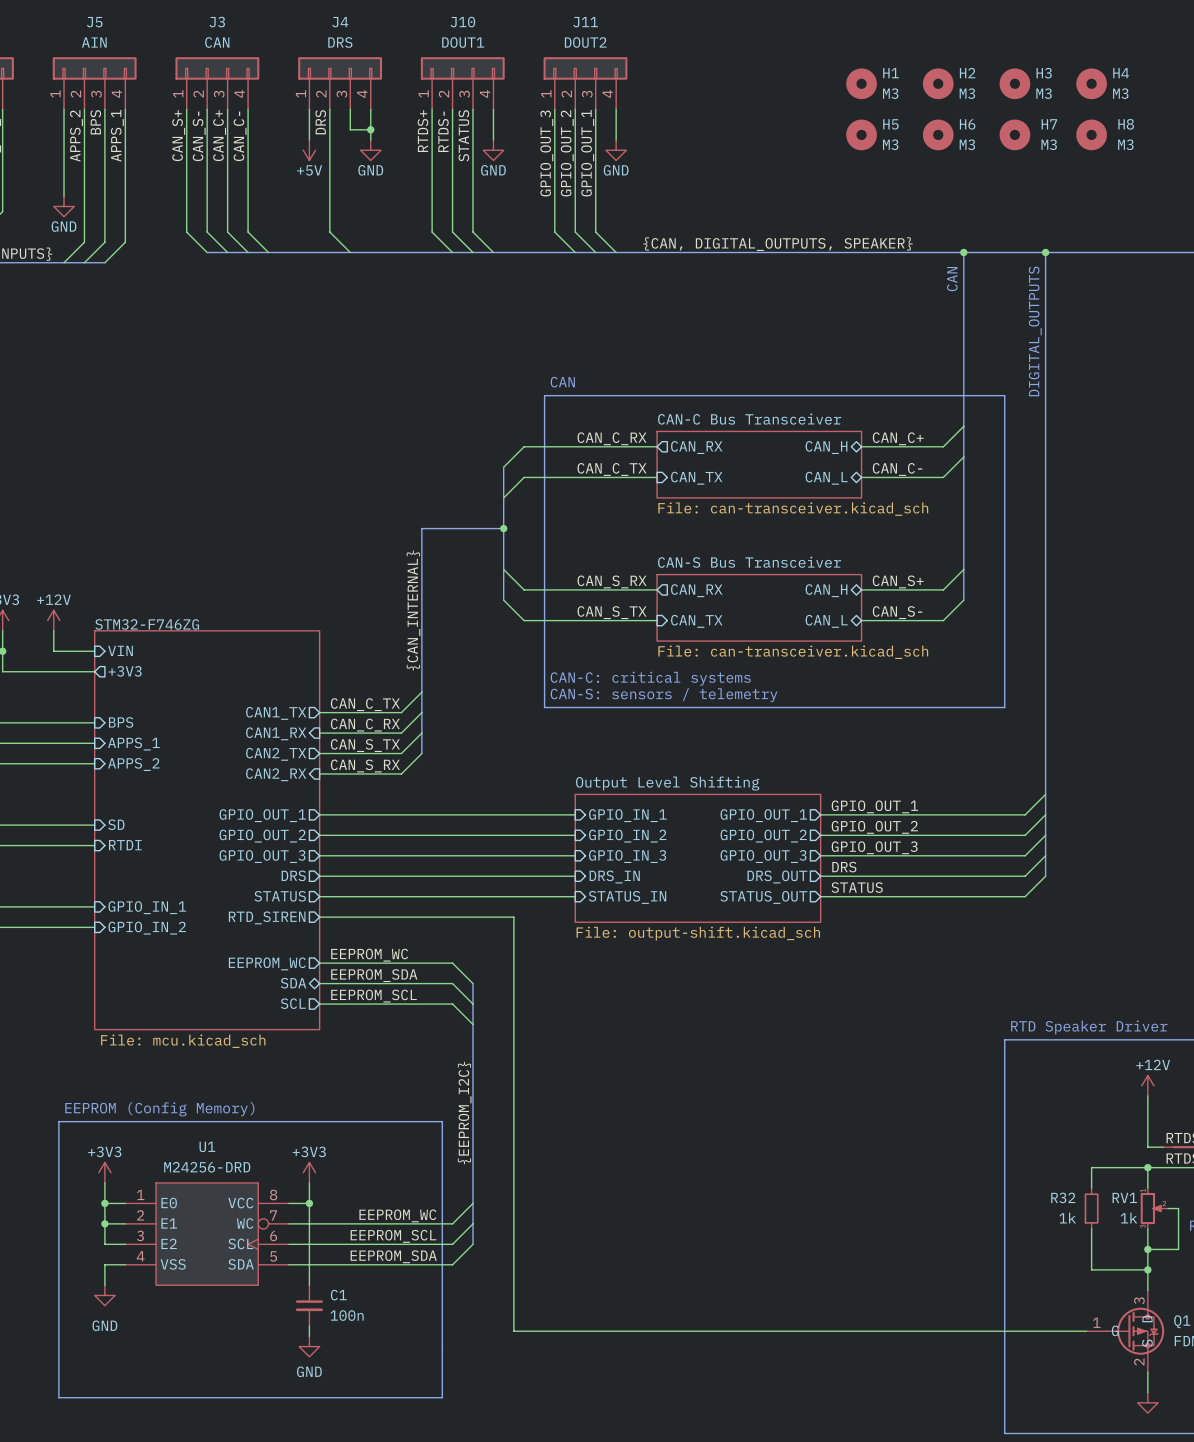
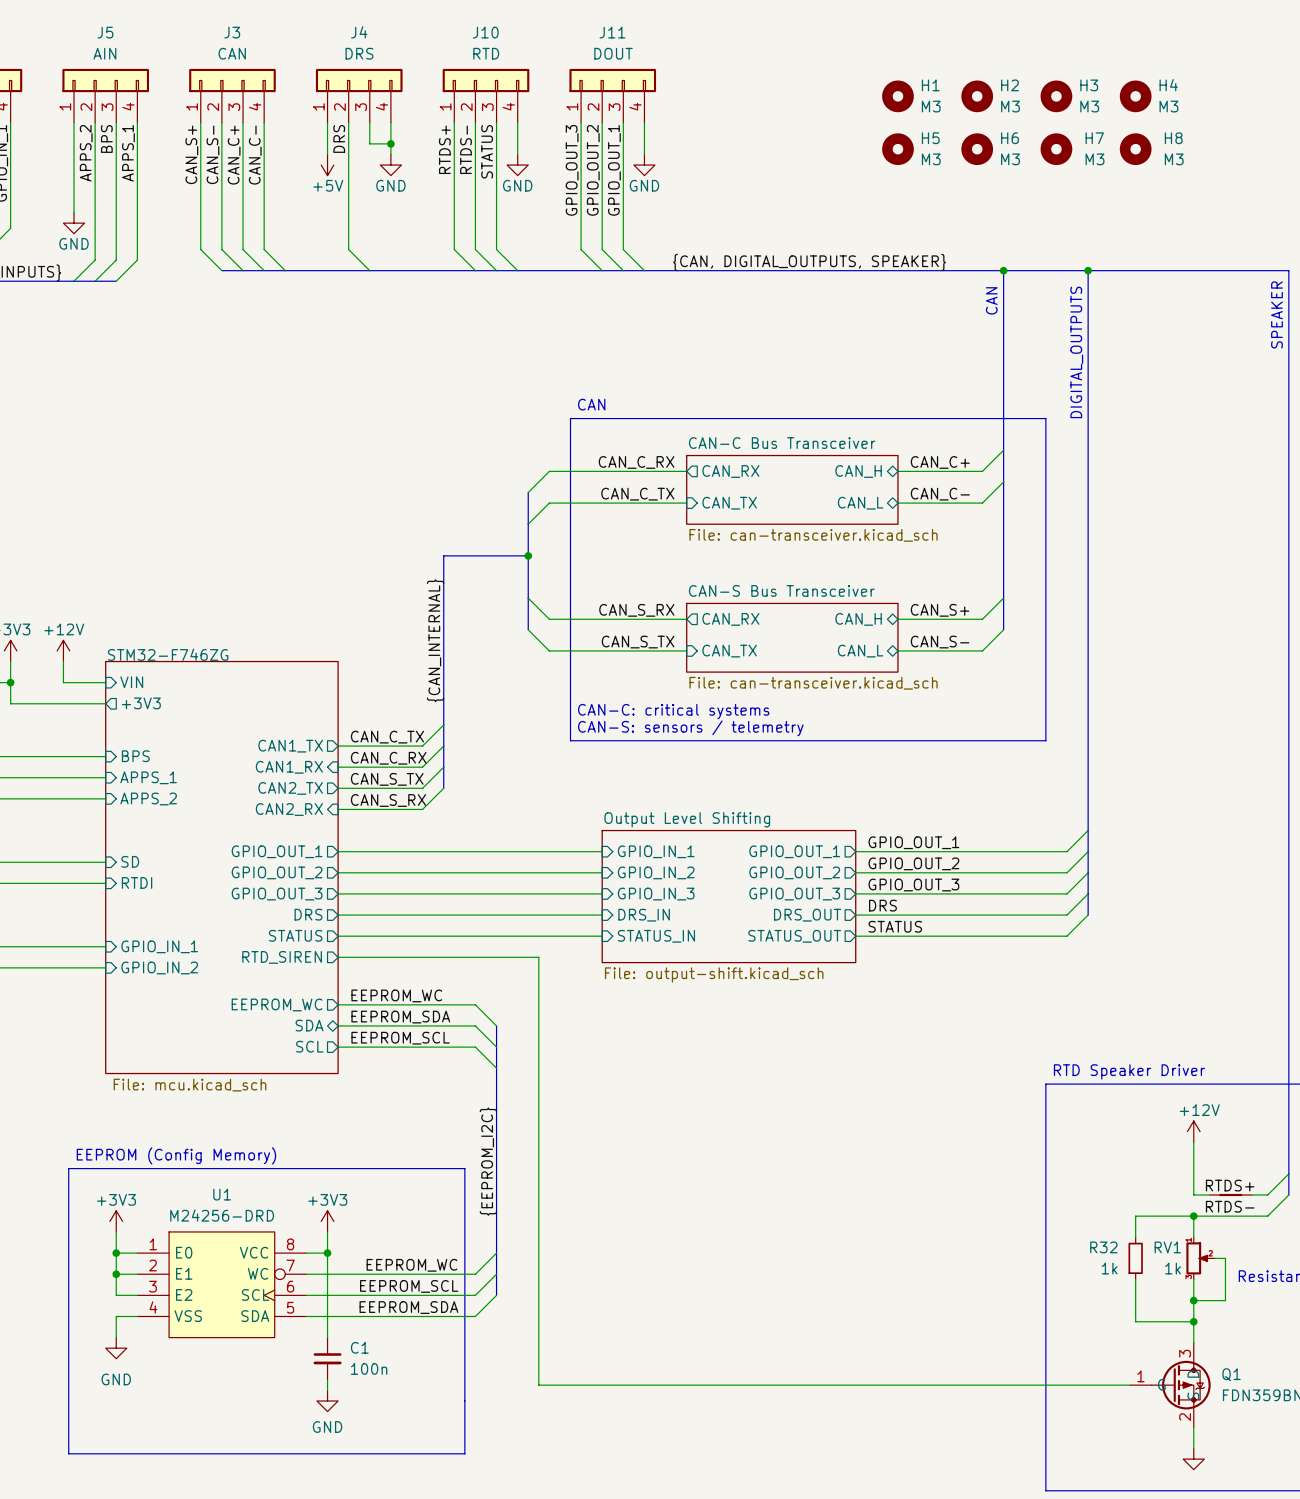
J10 value: DOUT1 (463, 42) -> RTD (486, 53)
J11 value: DOUT2 (585, 42) -> DOUT (613, 53)

